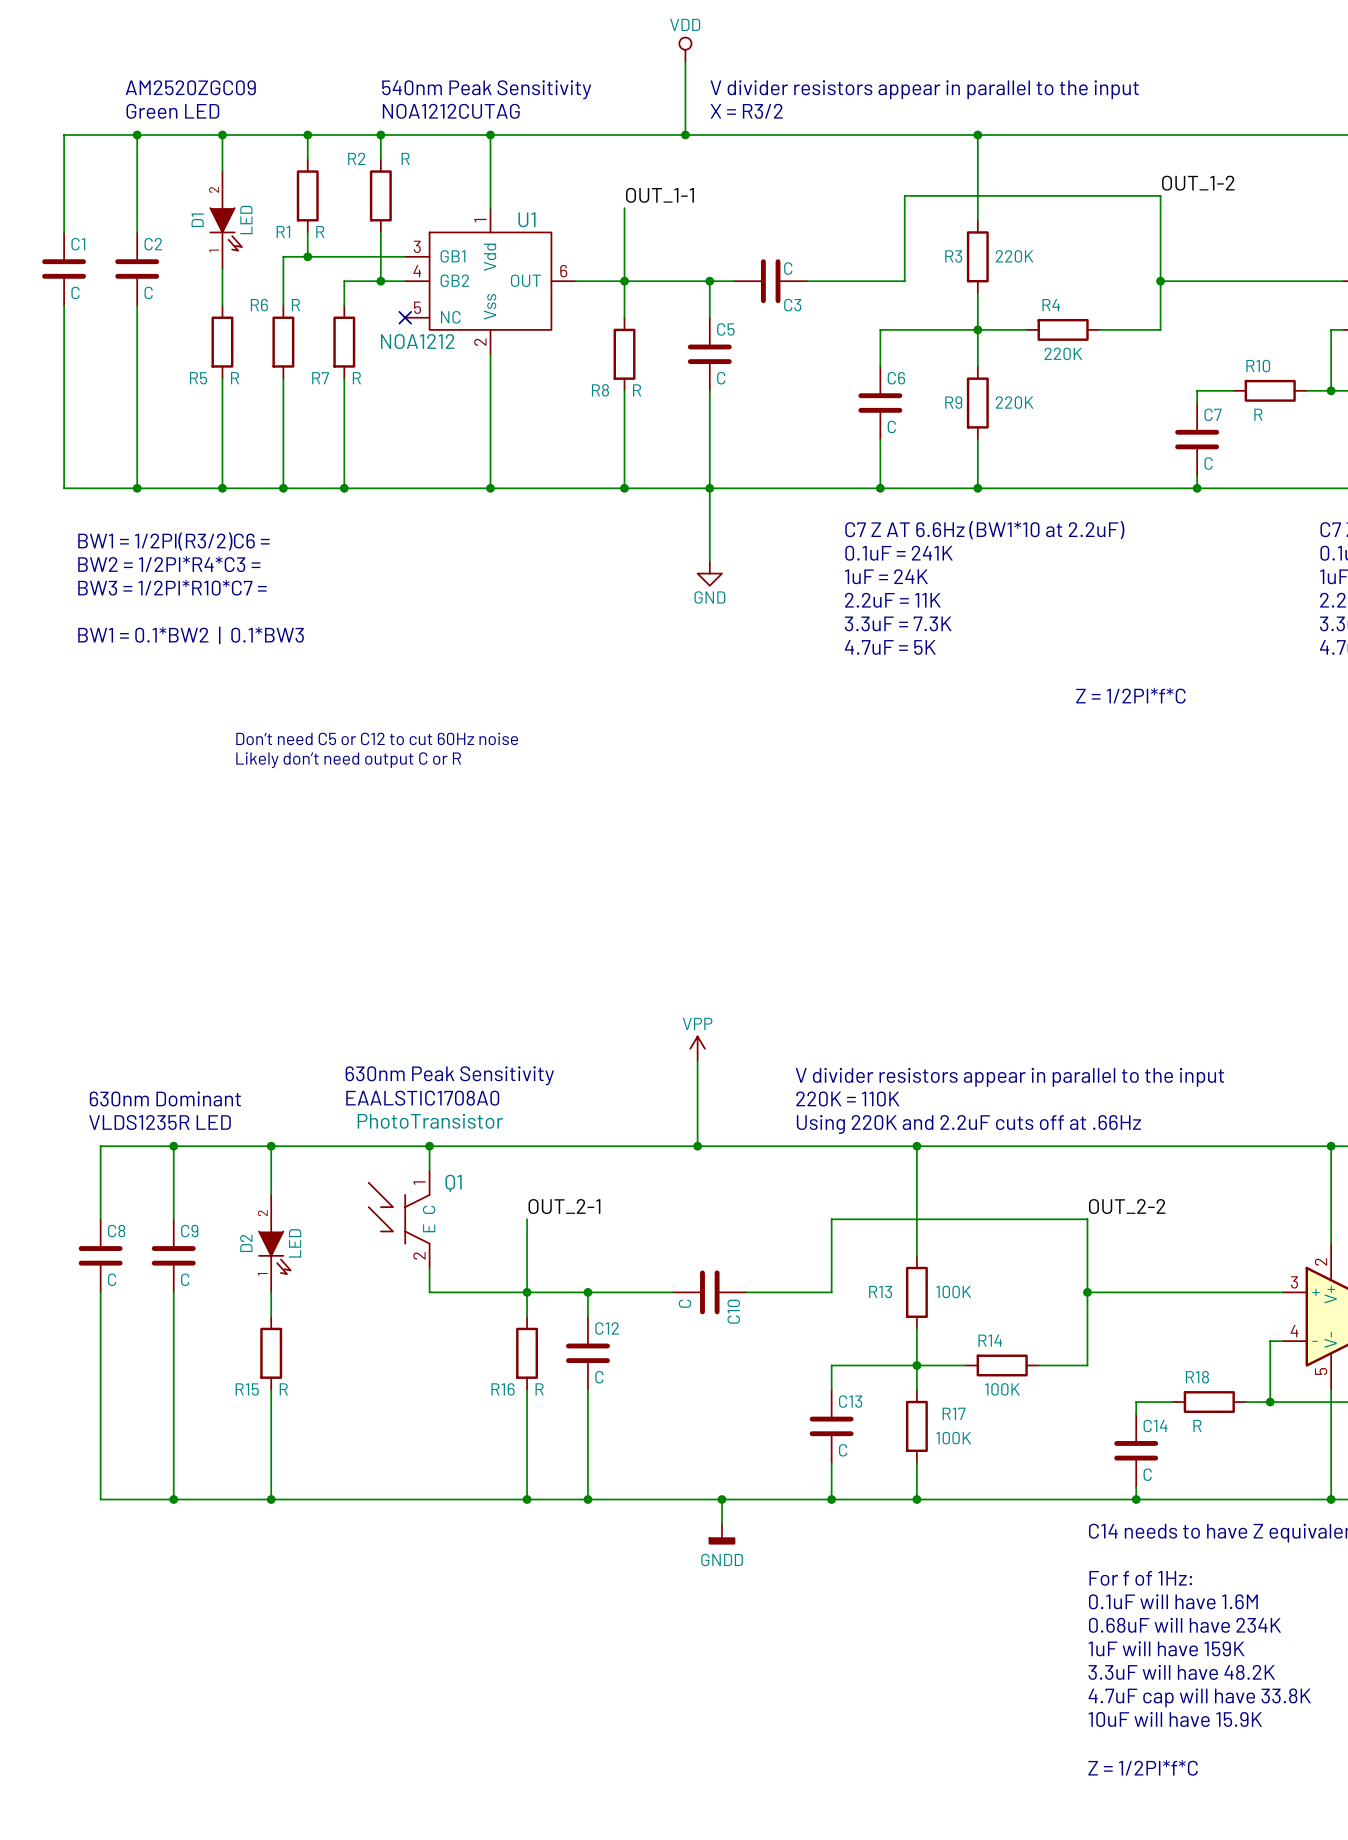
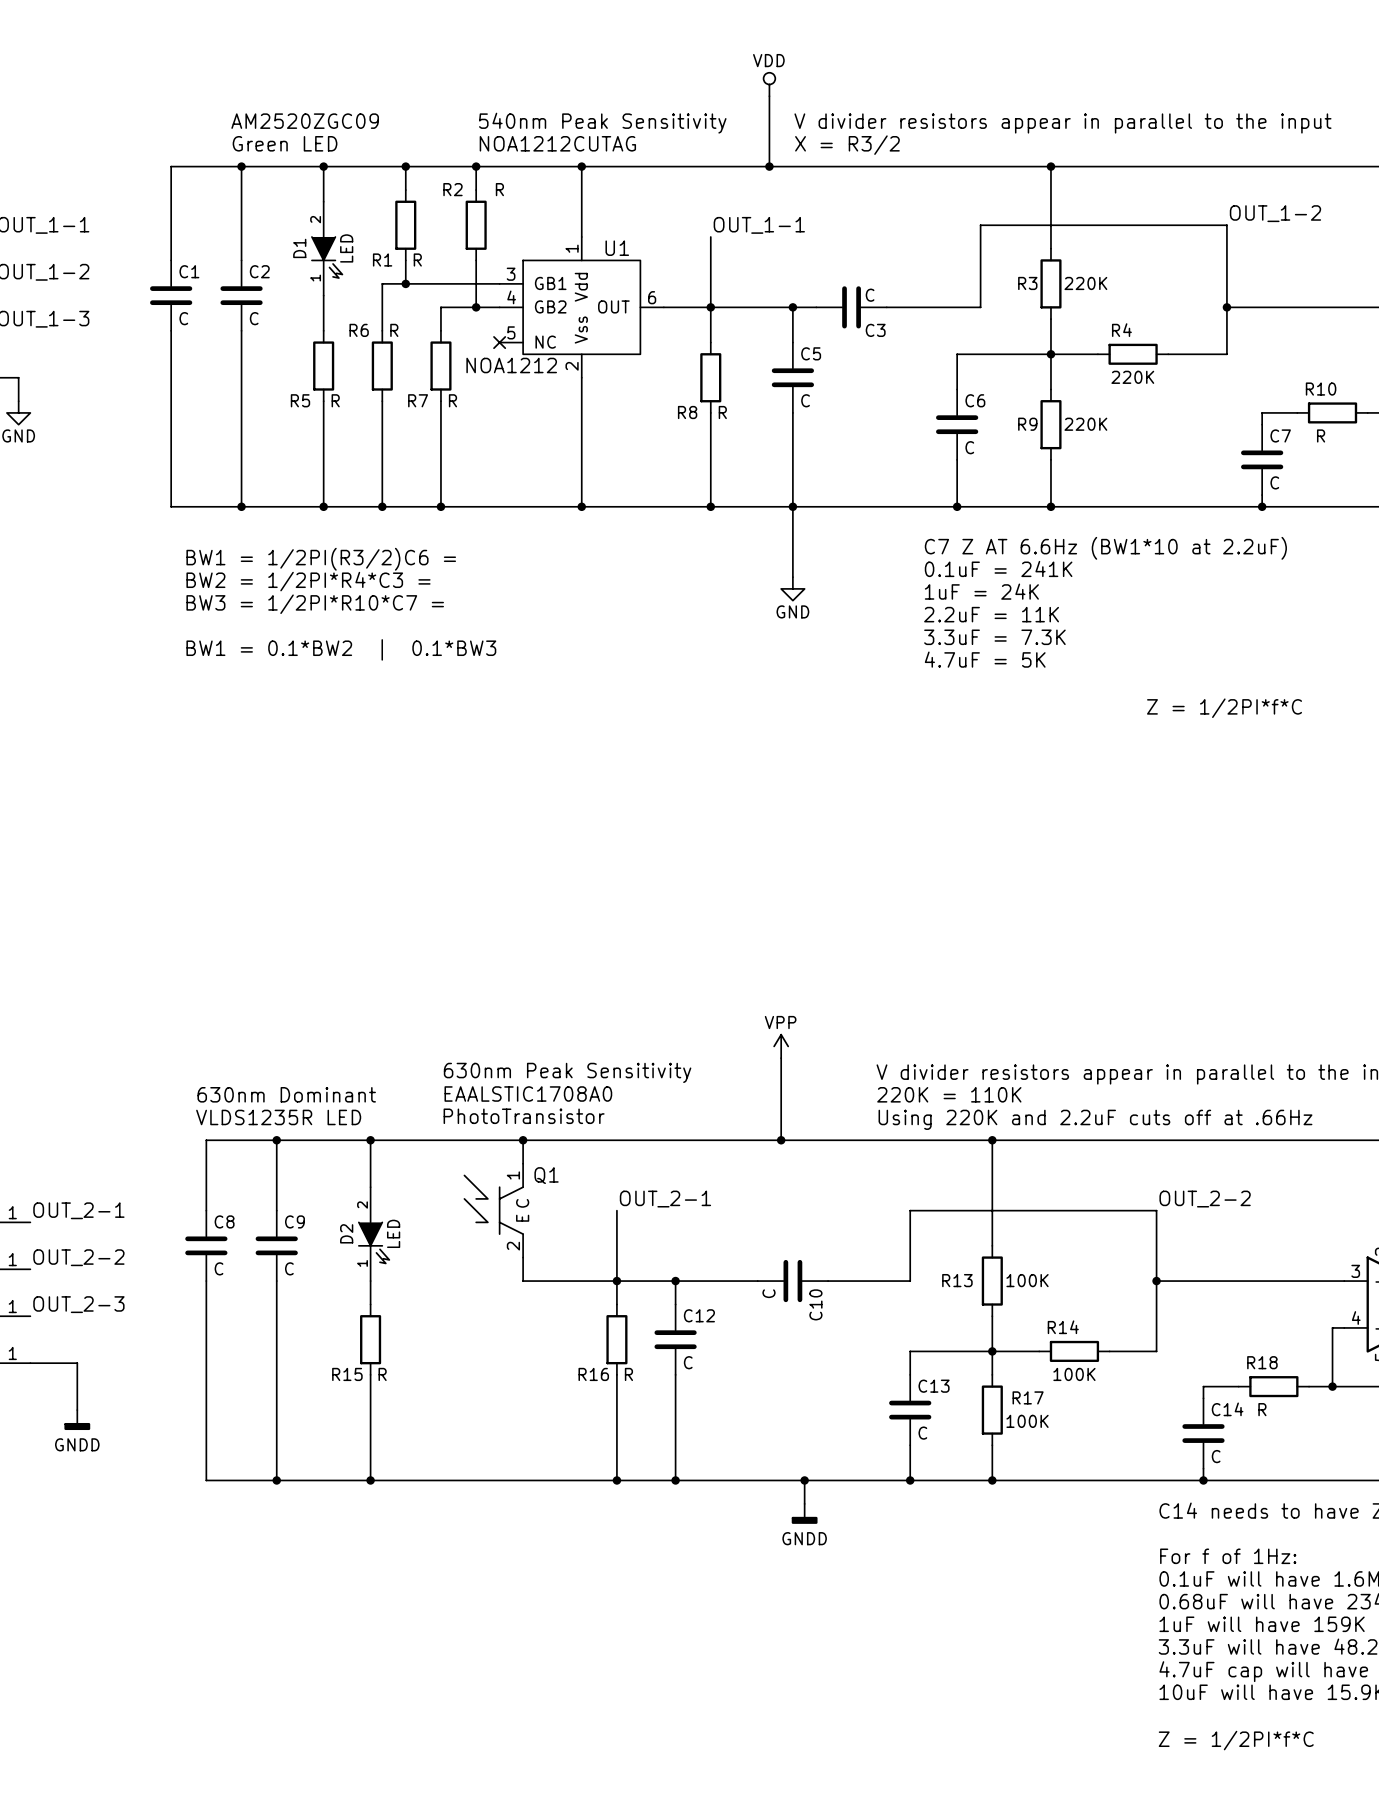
text: Don’t need C5 or C12 to cut 60Hz noise (377, 738) -> none
text: Likely don’t need output C or R (348, 760) -> none

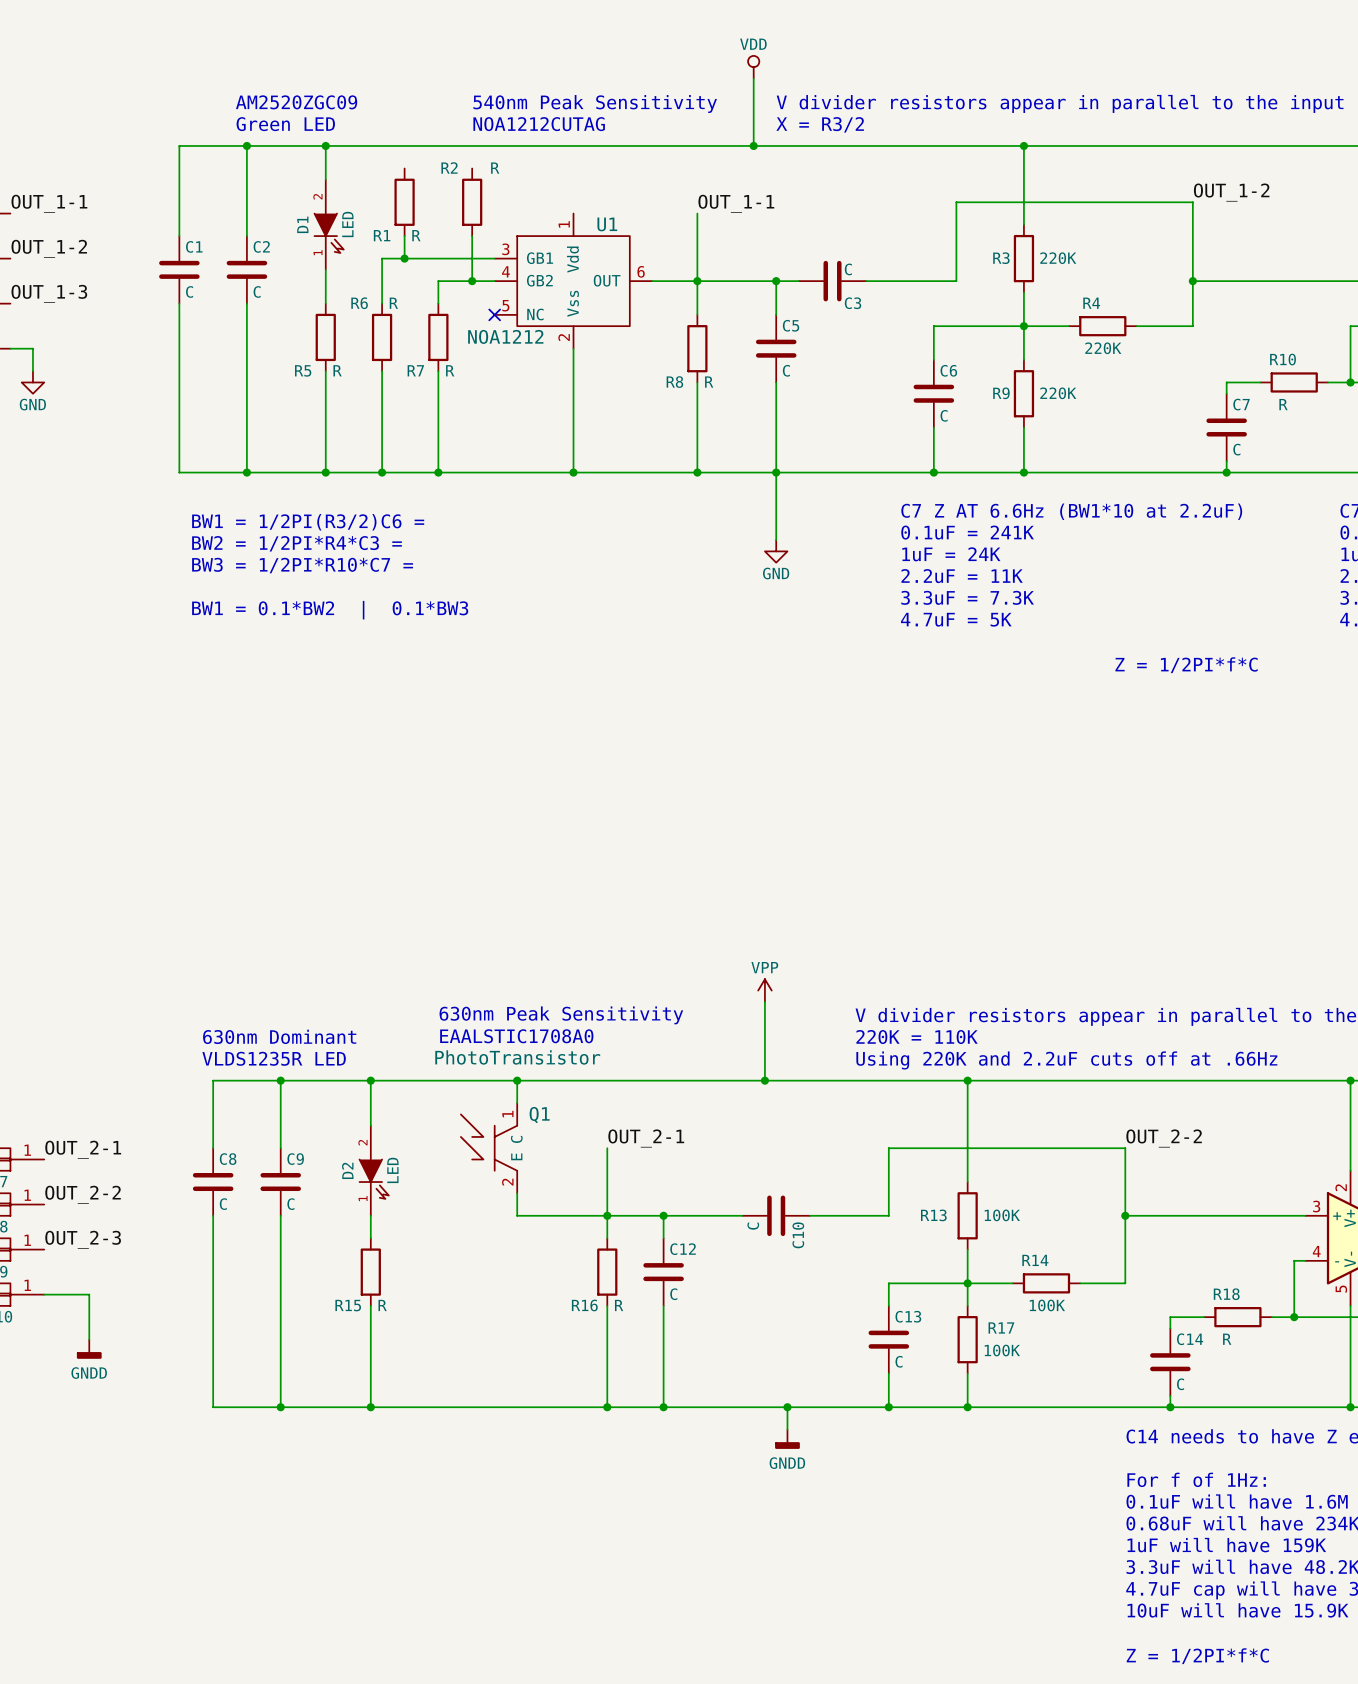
wire: (405, 166) (405, 190) -> none
junction: (405, 166) -> none
wire: (476, 166) (476, 190) -> none
junction: (476, 166) -> none
wire: (581, 166) (581, 236) -> none
junction: (581, 166) -> none

